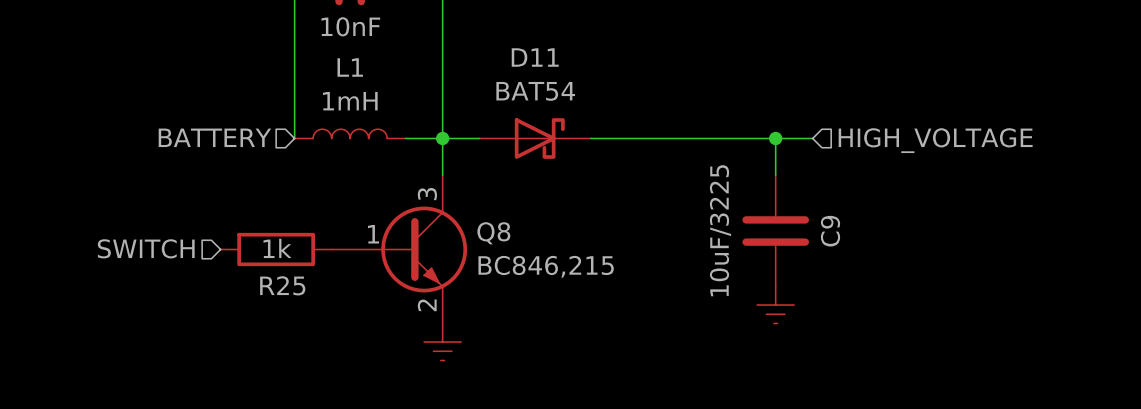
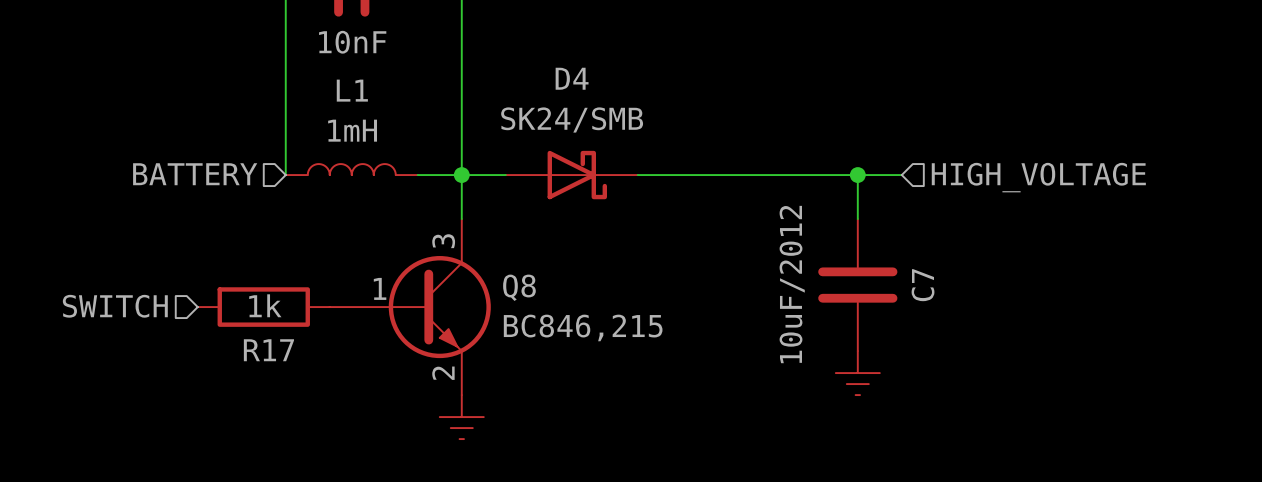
D11: BAT54 (535, 138) -> none
D4: none -> SK24/SMB (571, 175)
C9 value: 10uF/3225 (720, 230) -> 10uF/2012 (792, 284)
C9 name: C9 (830, 231) -> C7 (923, 285)
R25 name: R25 (282, 285) -> R17 (268, 350)

